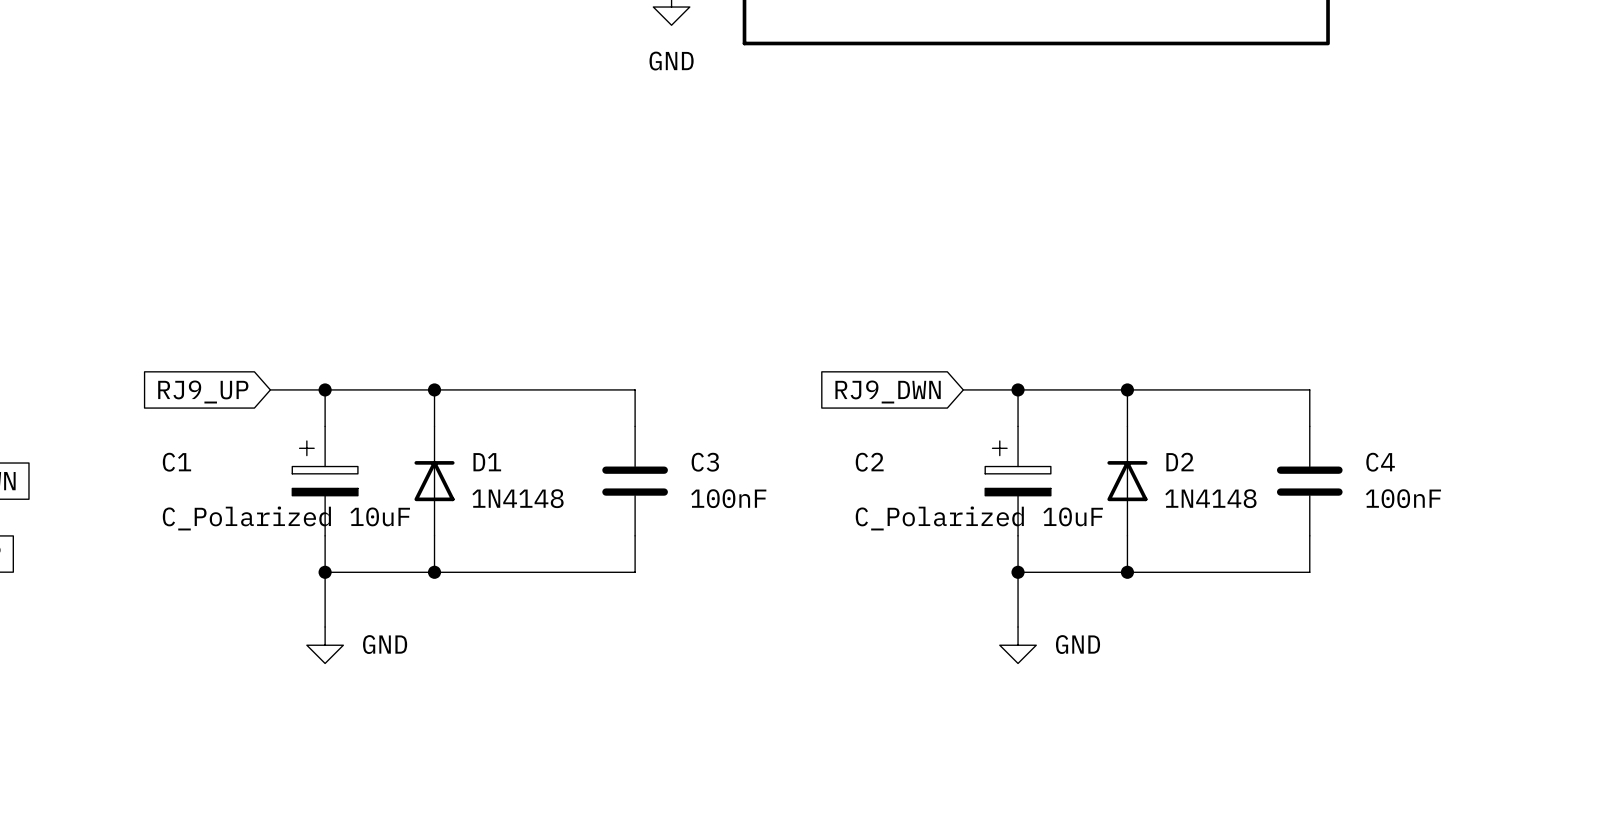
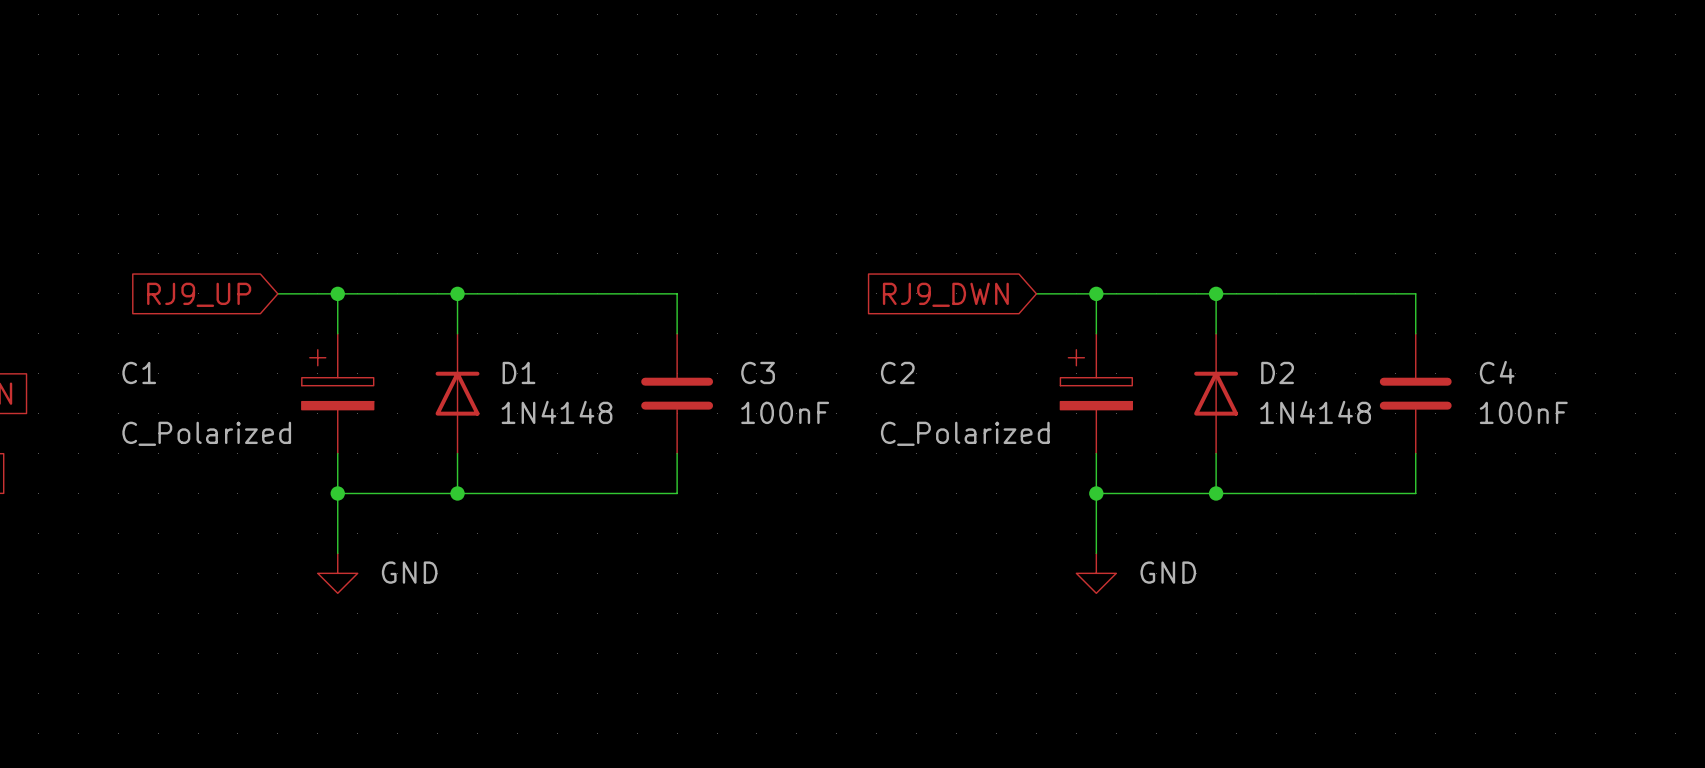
C1 name position: C1 (176, 462) -> C1 (139, 372)
C2 name position: C2 (869, 462) -> C2 (897, 372)
C1 value: C_Polarized 10uF (286, 518) -> C_Polarized (206, 433)
C2 value: C_Polarized 10uF (979, 518) -> C_Polarized (965, 433)

